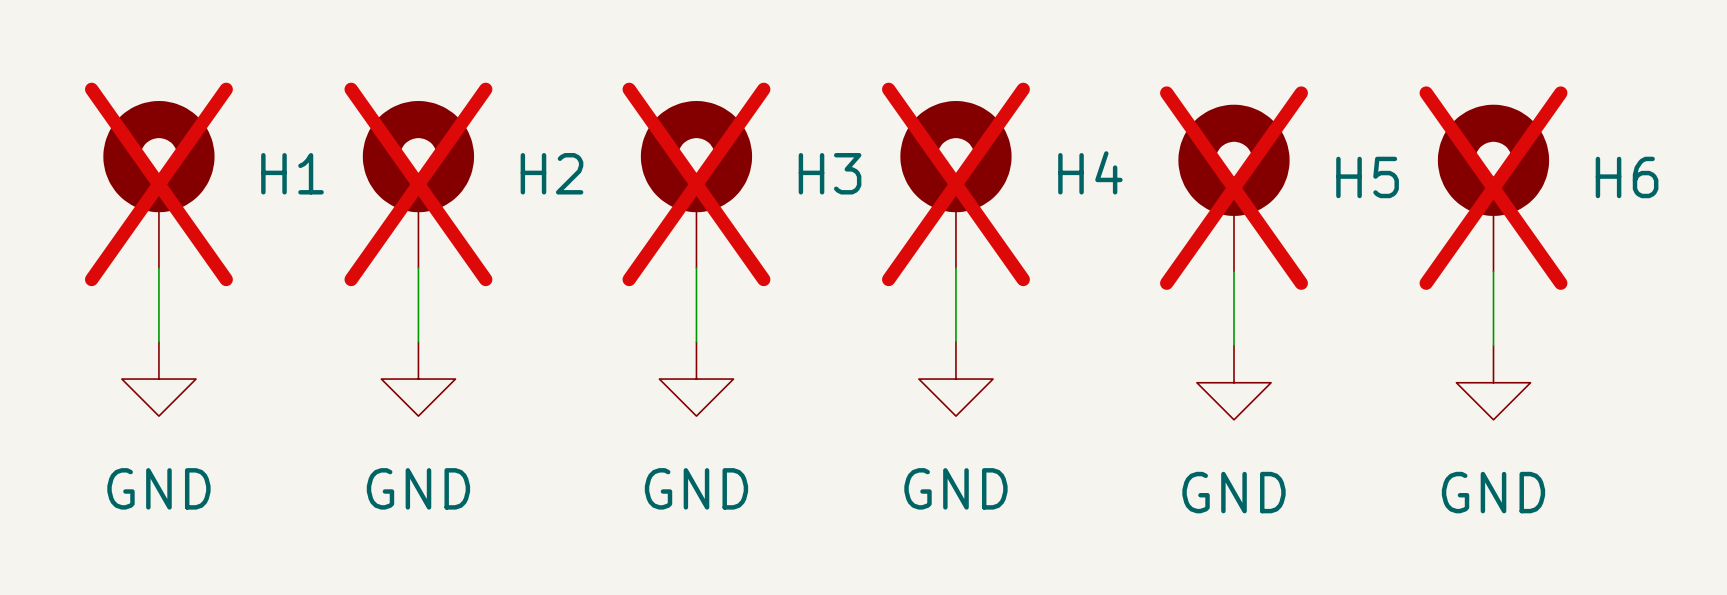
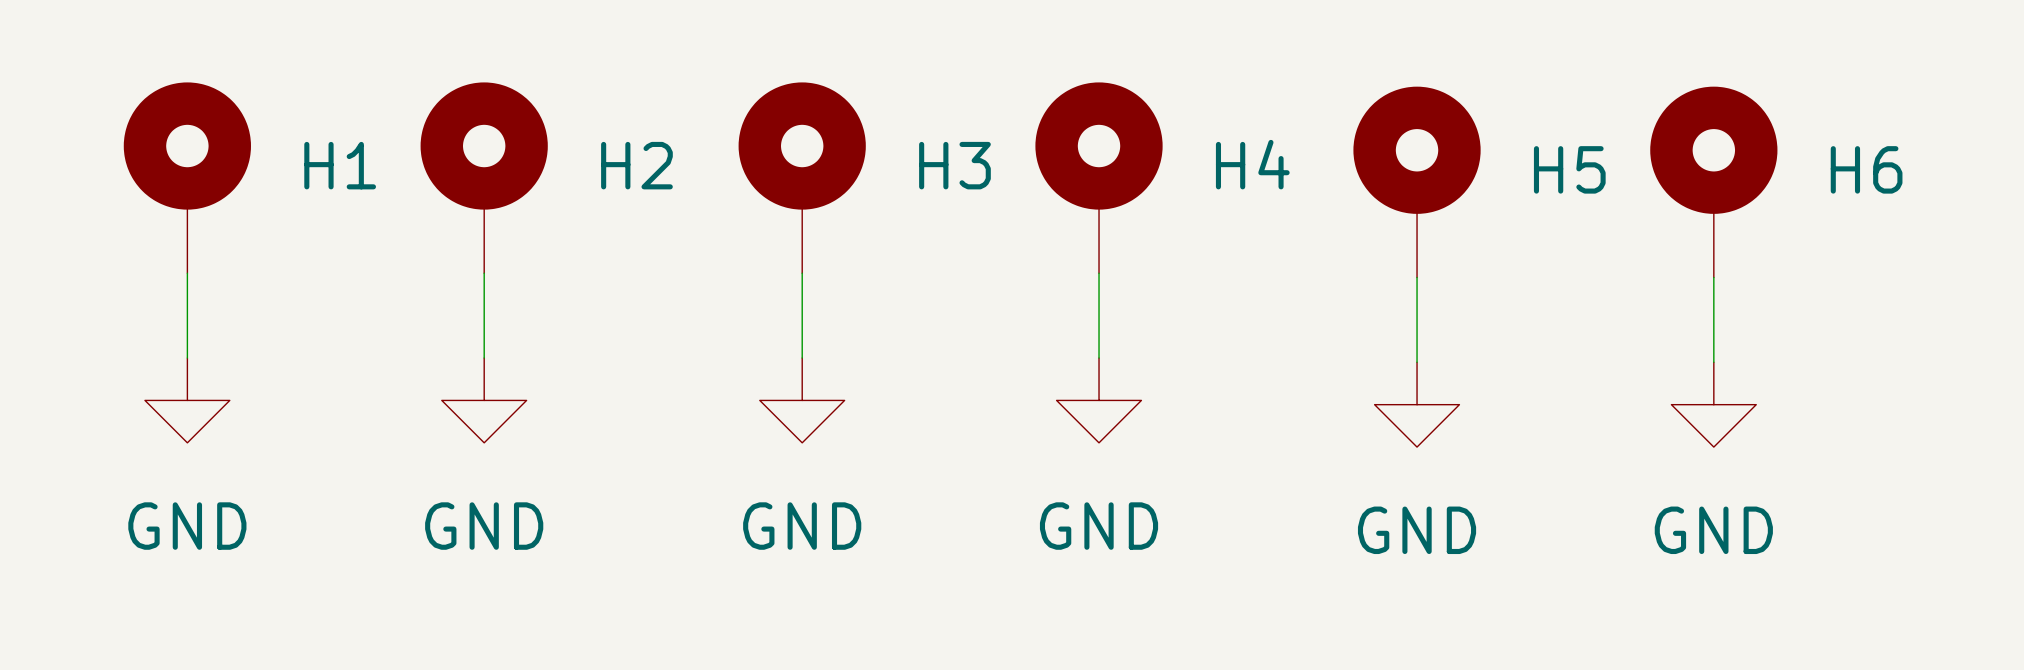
H1 do-not-place cross: (158, 184) -> none
H2 do-not-place cross: (418, 184) -> none
H3 do-not-place cross: (696, 184) -> none
H4 do-not-place cross: (955, 184) -> none
H5 do-not-place cross: (1234, 188) -> none
H6 do-not-place cross: (1493, 188) -> none

